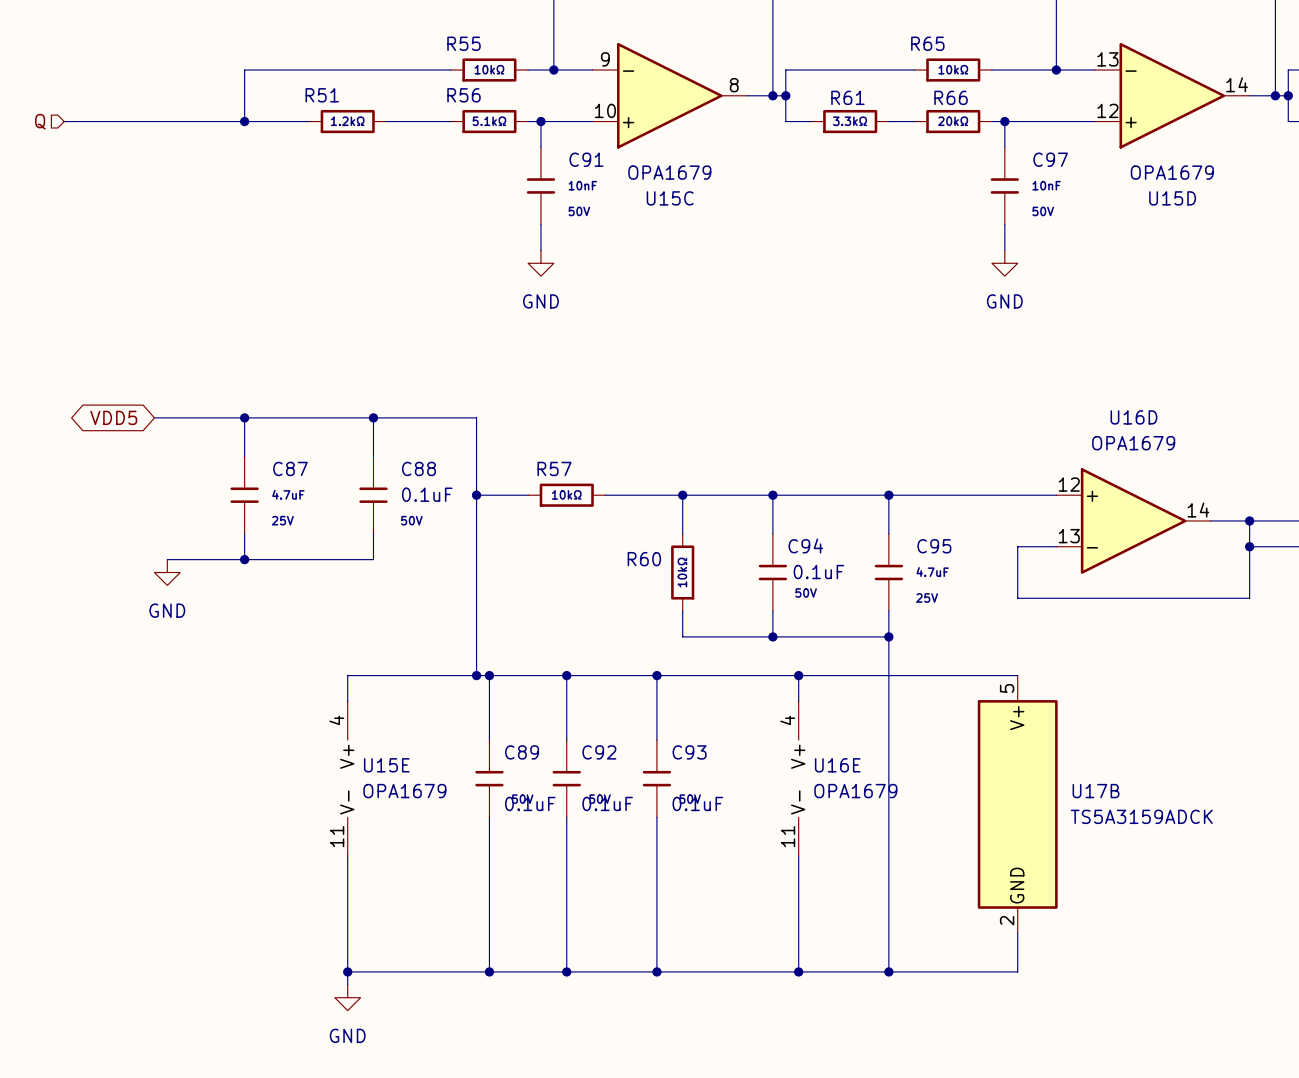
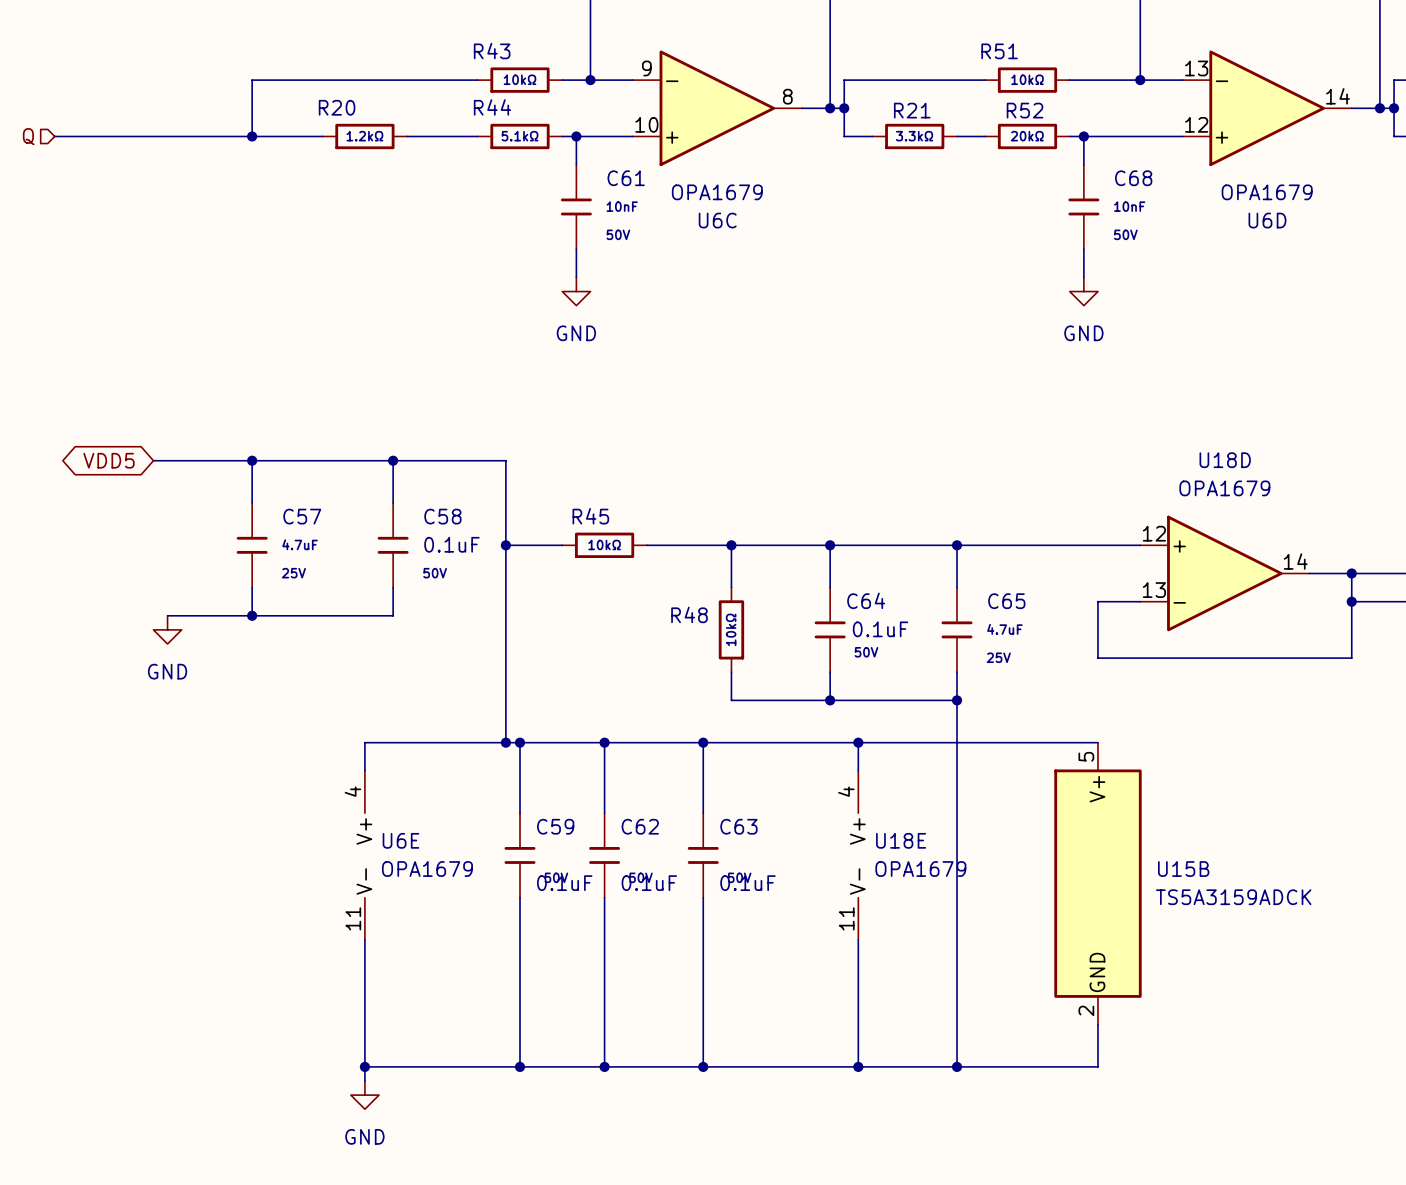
R55 name: R55 (463, 43) -> R43 (492, 51)
R65 name: R65 (927, 43) -> R51 (999, 51)
R51 name: R51 (322, 95) -> R20 (337, 107)
R56 name: R56 (463, 95) -> R44 (492, 107)
R61 name: R61 (847, 97) -> R21 (912, 110)
R66 name: R66 (951, 97) -> R52 (1025, 110)
C91 name: C91 (586, 159) -> C61 (626, 178)
C97 name: C97 (1050, 159) -> C68 (1133, 178)
U15C name: U15C (670, 198) -> U6C (717, 220)
U15D name: U15D (1172, 198) -> U6D (1267, 220)
U16D name: U16D (1133, 417) -> U18D (1225, 460)
C87 name: C87 (290, 468) -> C57 (302, 516)
C88 name: C88 (418, 468) -> C58 (442, 516)
R57 name: R57 (554, 468) -> R45 (590, 516)
C94 name: C94 (805, 545) -> C64 (866, 600)
C95 name: C95 (934, 546) -> C65 (1006, 601)
R60 name: R60 (644, 559) -> R48 (689, 614)
C89 name: C89 (522, 752) -> C59 (555, 826)
C92 name: C92 (599, 752) -> C62 (640, 826)
C93 name: C93 (689, 752) -> C63 (738, 826)
U15E name: U15E (386, 765) -> U6E (400, 840)
U16E name: U16E (837, 765) -> U18E (901, 840)
U17B name: U17B (1096, 791) -> U15B (1183, 869)

